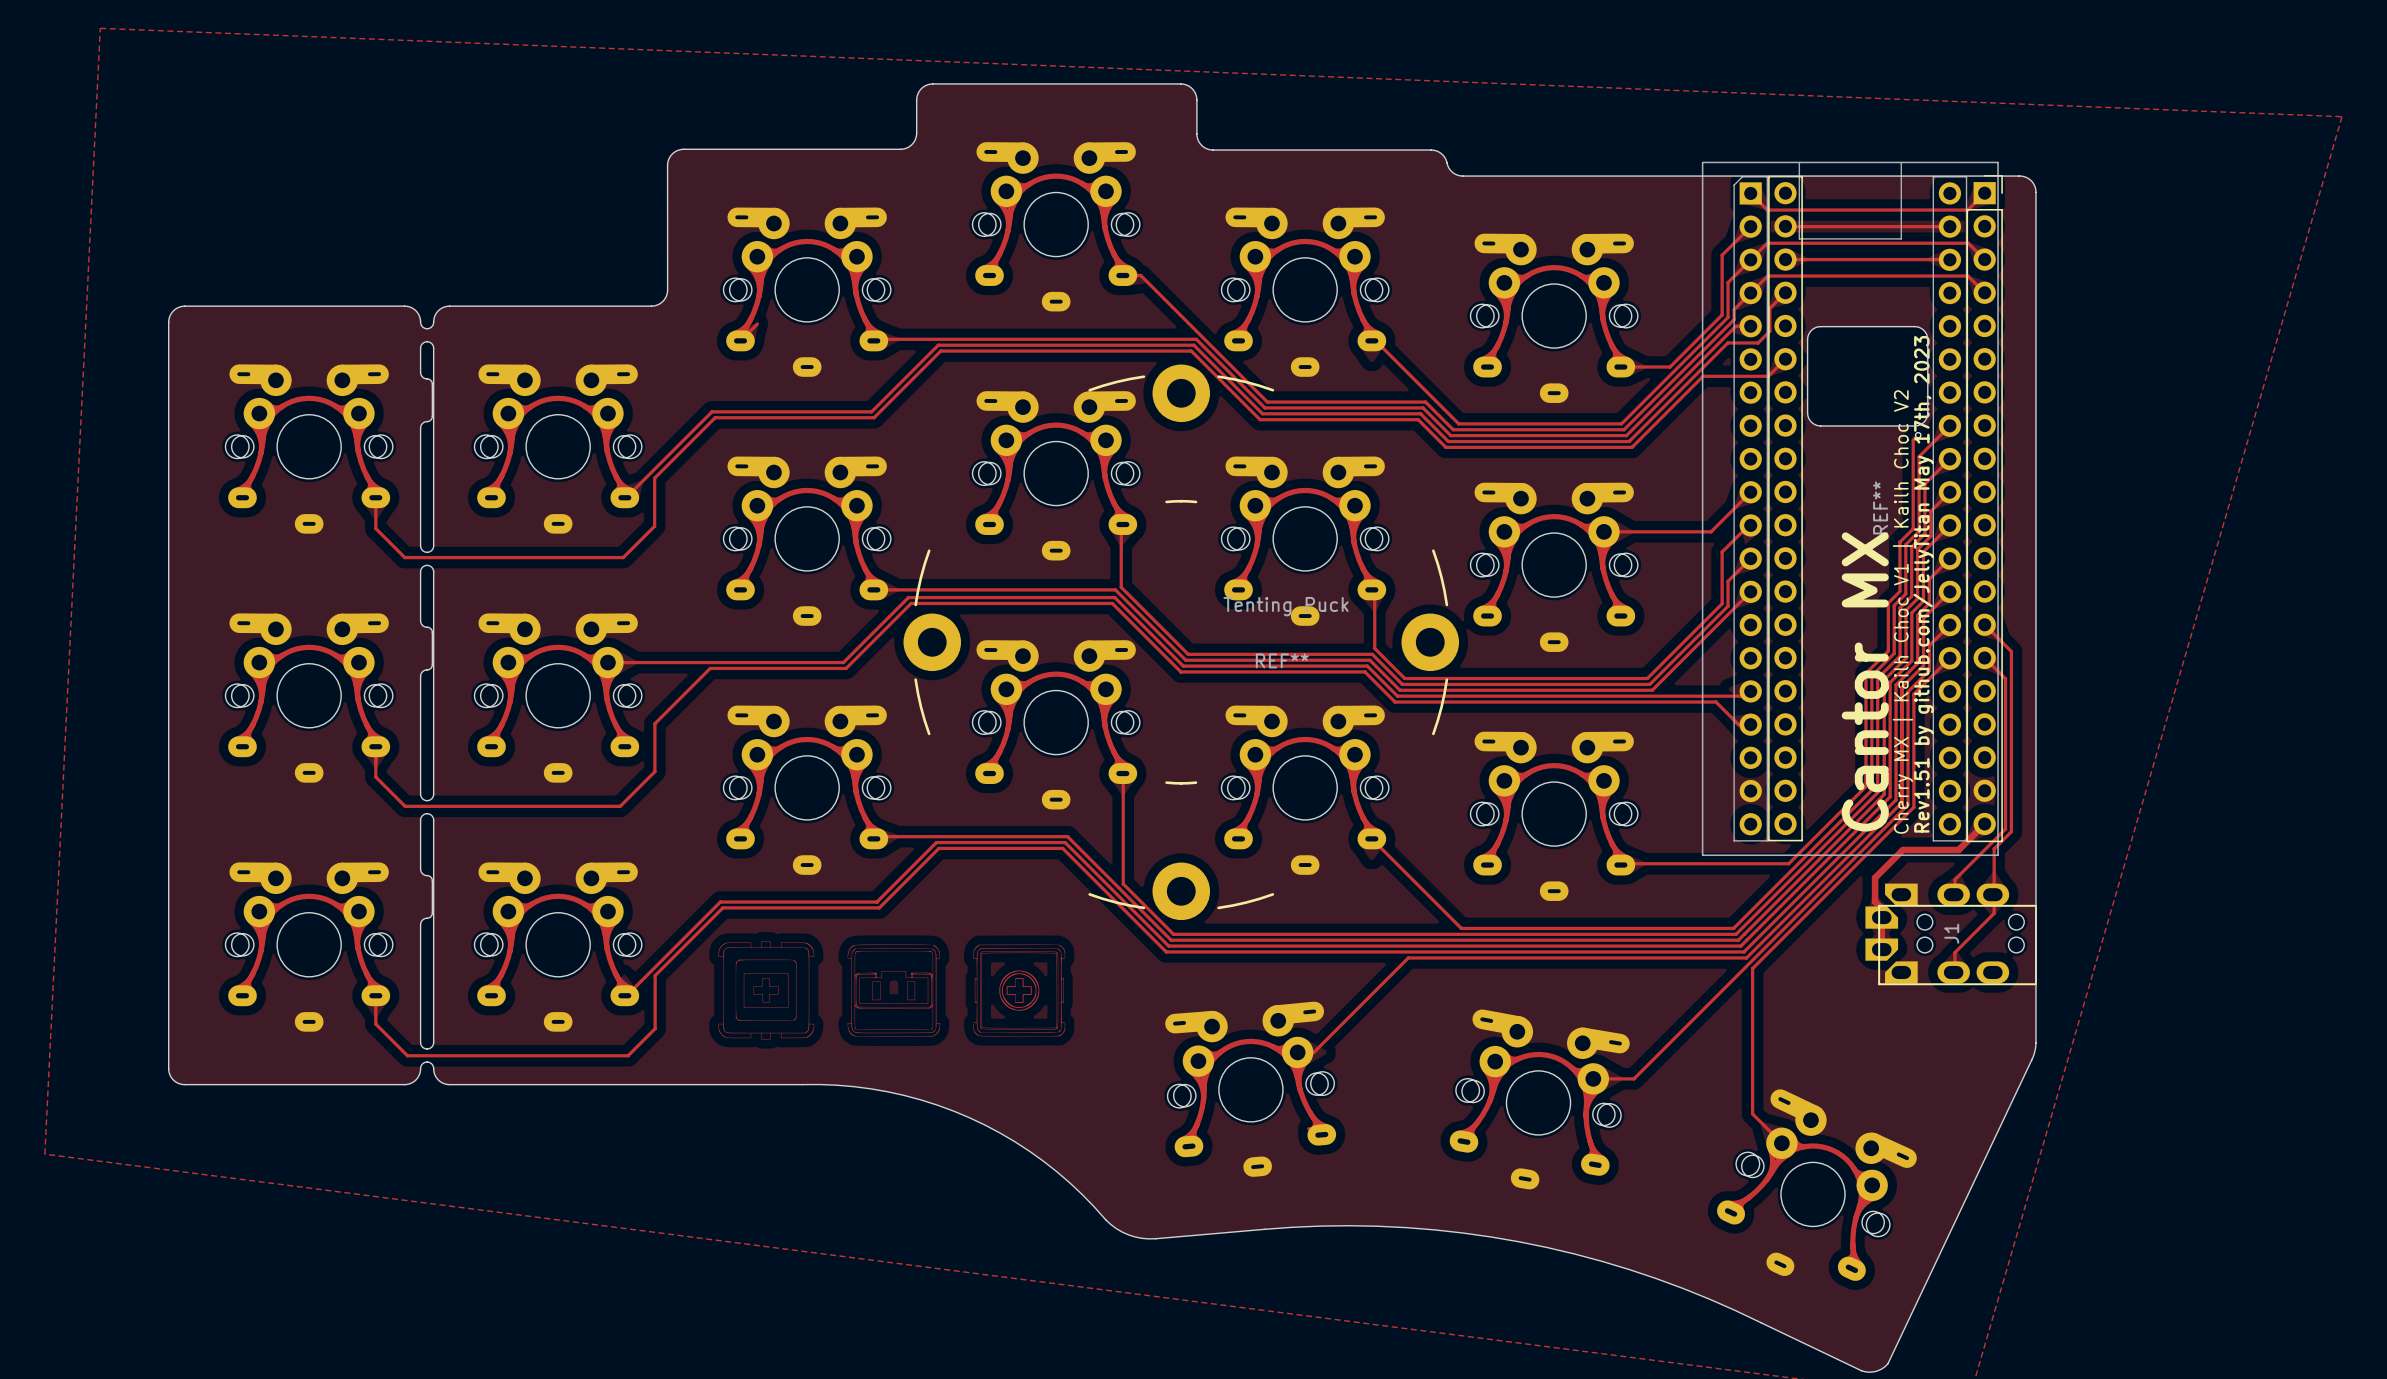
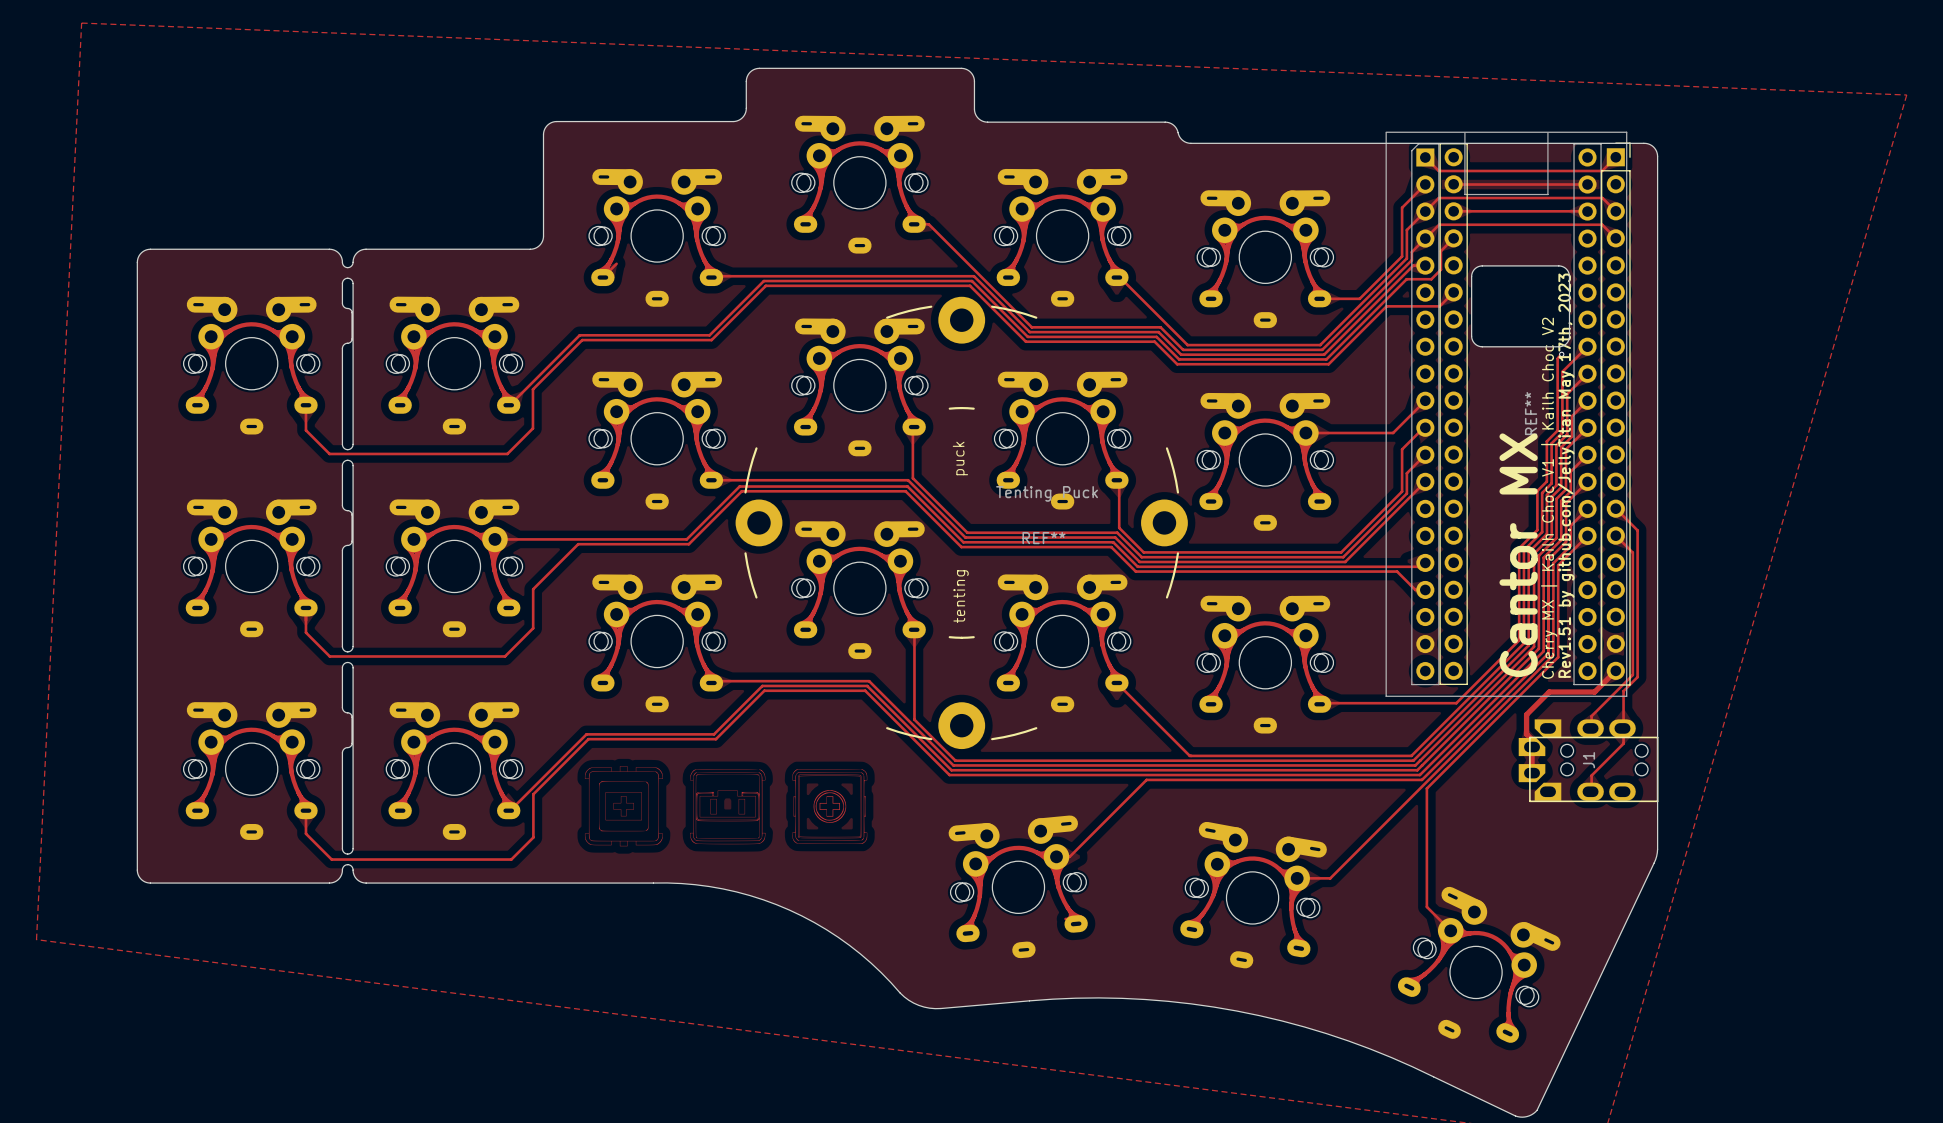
REF** text: none -> puck (960, 458)
REF** text: none -> tenting (961, 596)

